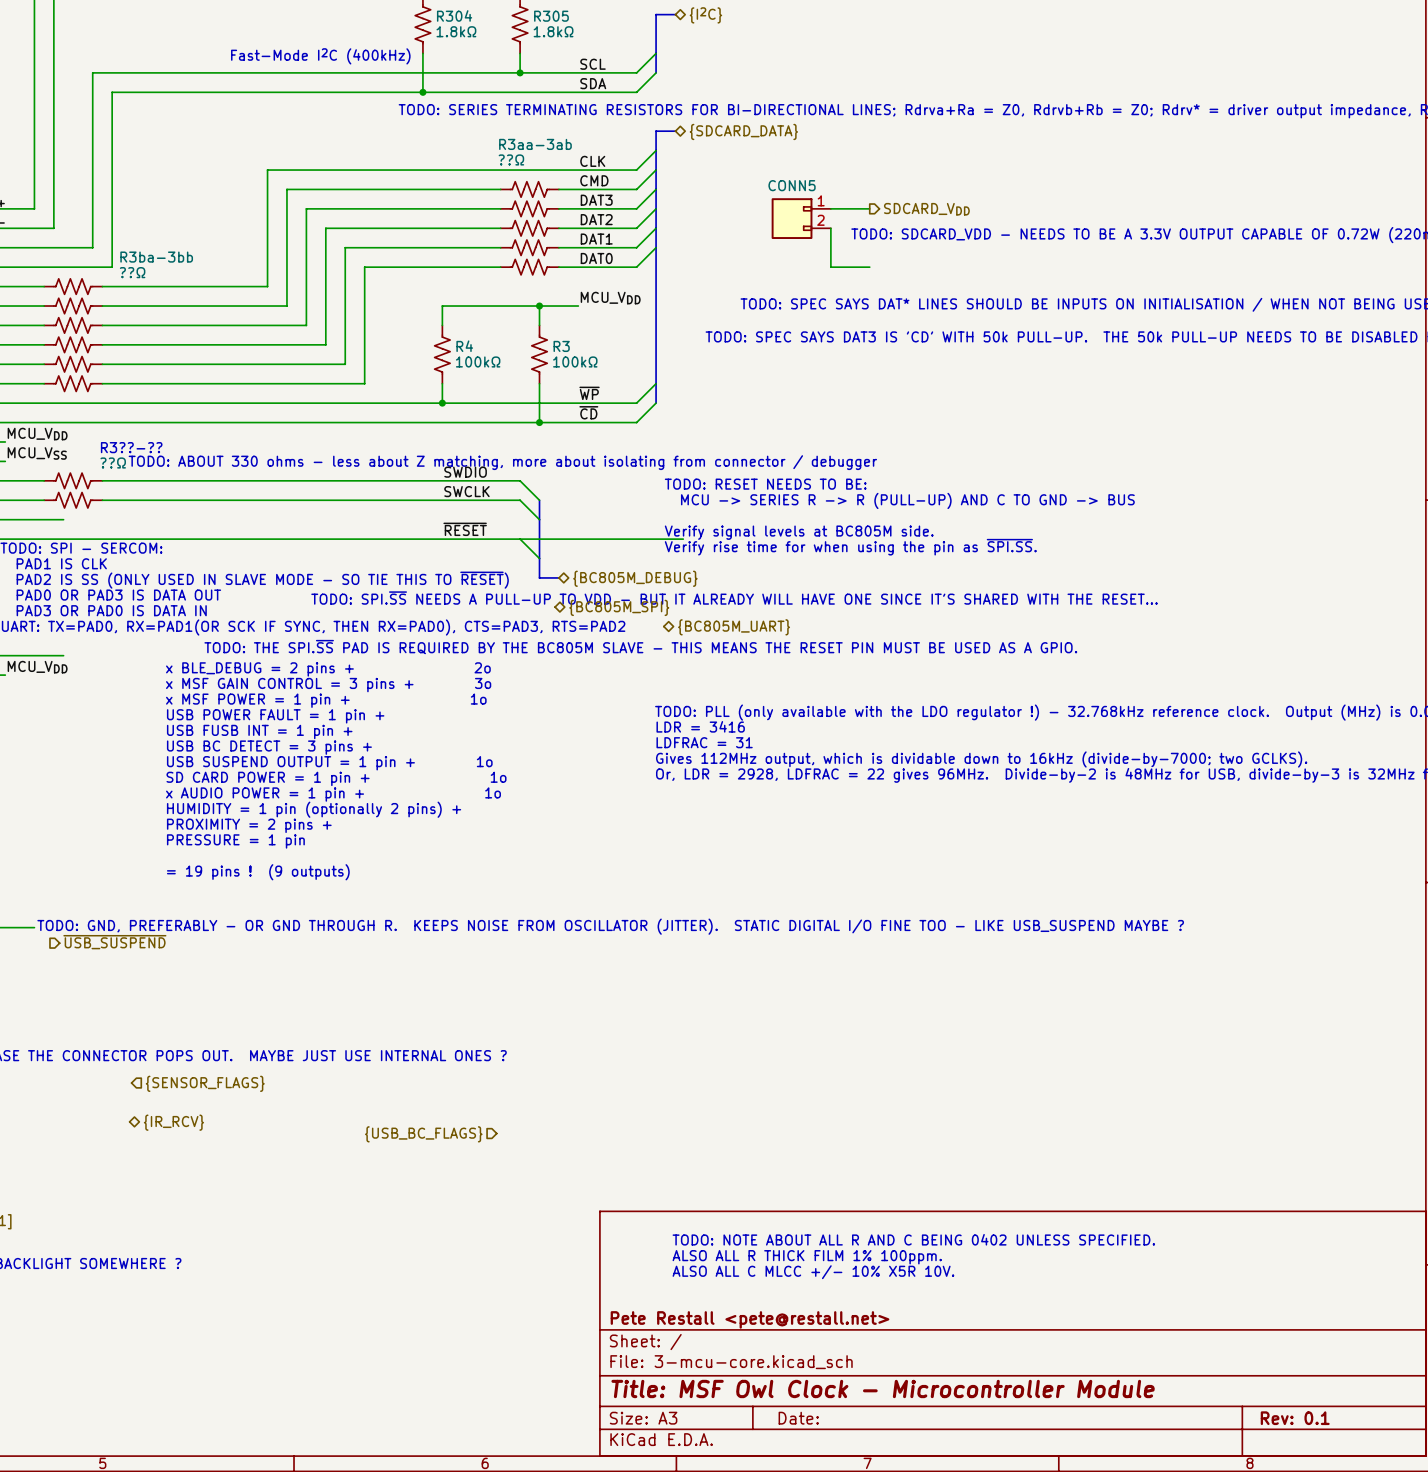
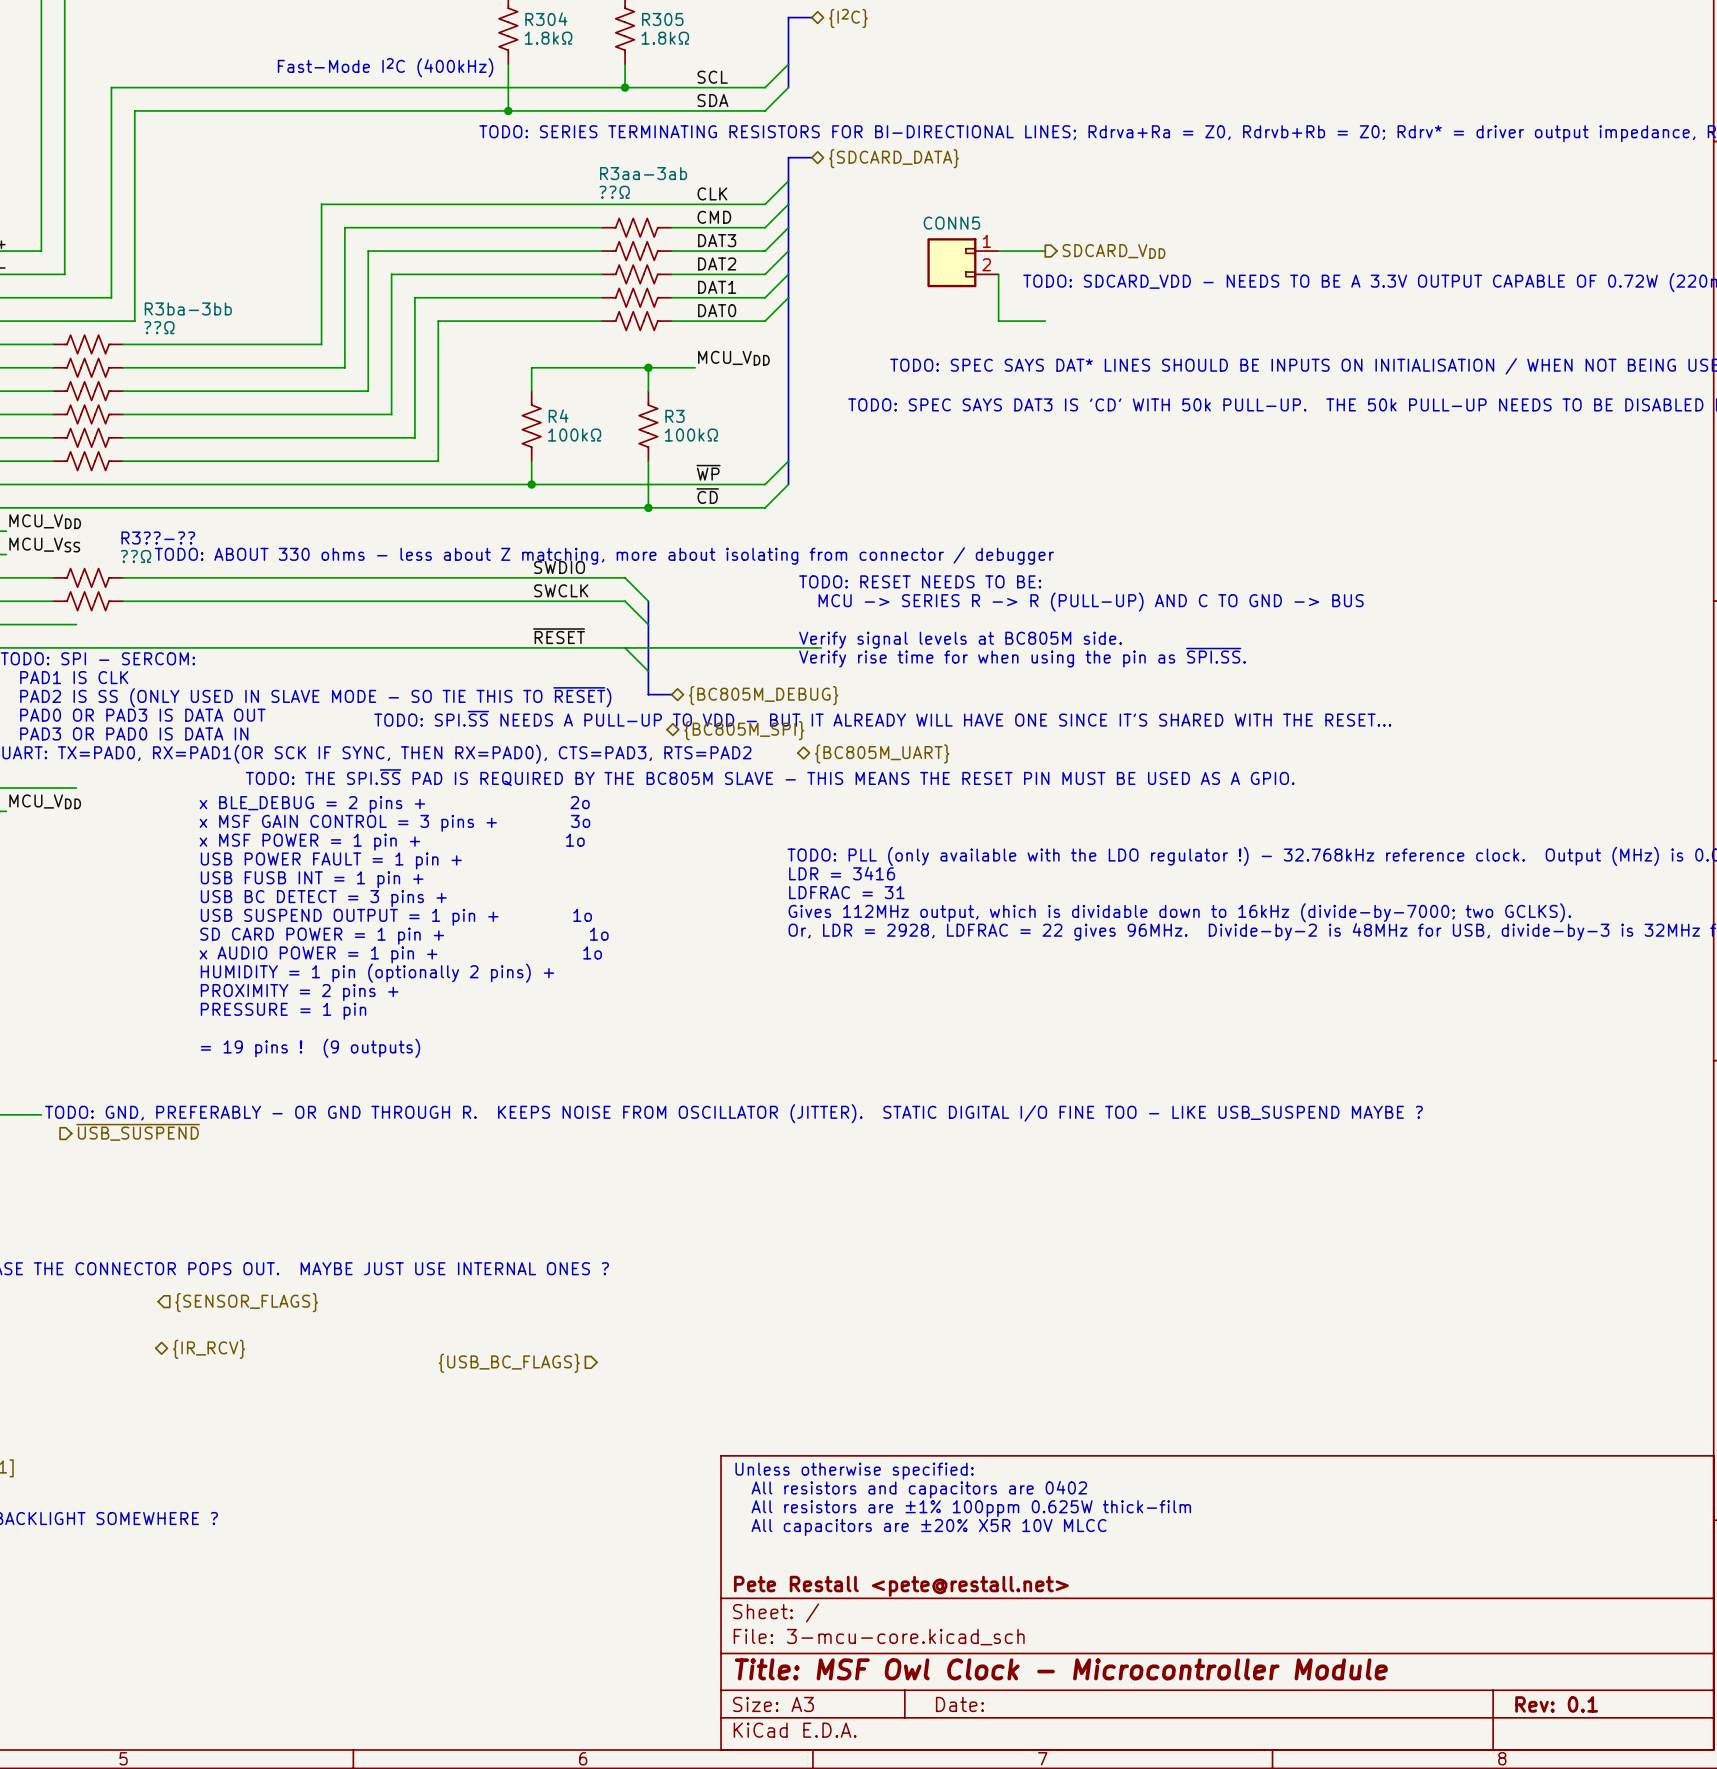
text: none -> Unless otherwise specified: (854, 1471)
text: none -> All resistors and capacitors are 0402 (919, 1489)
text: TODO: NOTE ABOUT ALL R AND C BEING 0402 UNLESS SPECIFIED. (913, 1239) -> none
text: none -> All resistors are ±1% 100ppm 0.625W thick-film (971, 1508)
text: ALSO ALL R THICK FILM 1% 100ppm. (807, 1257) -> none
text: none -> All capacitors are ±20% X5R 10V MLCC (929, 1527)
text: ALSO ALL C MLCC +/- 10% X5R 10V. (813, 1272) -> none

